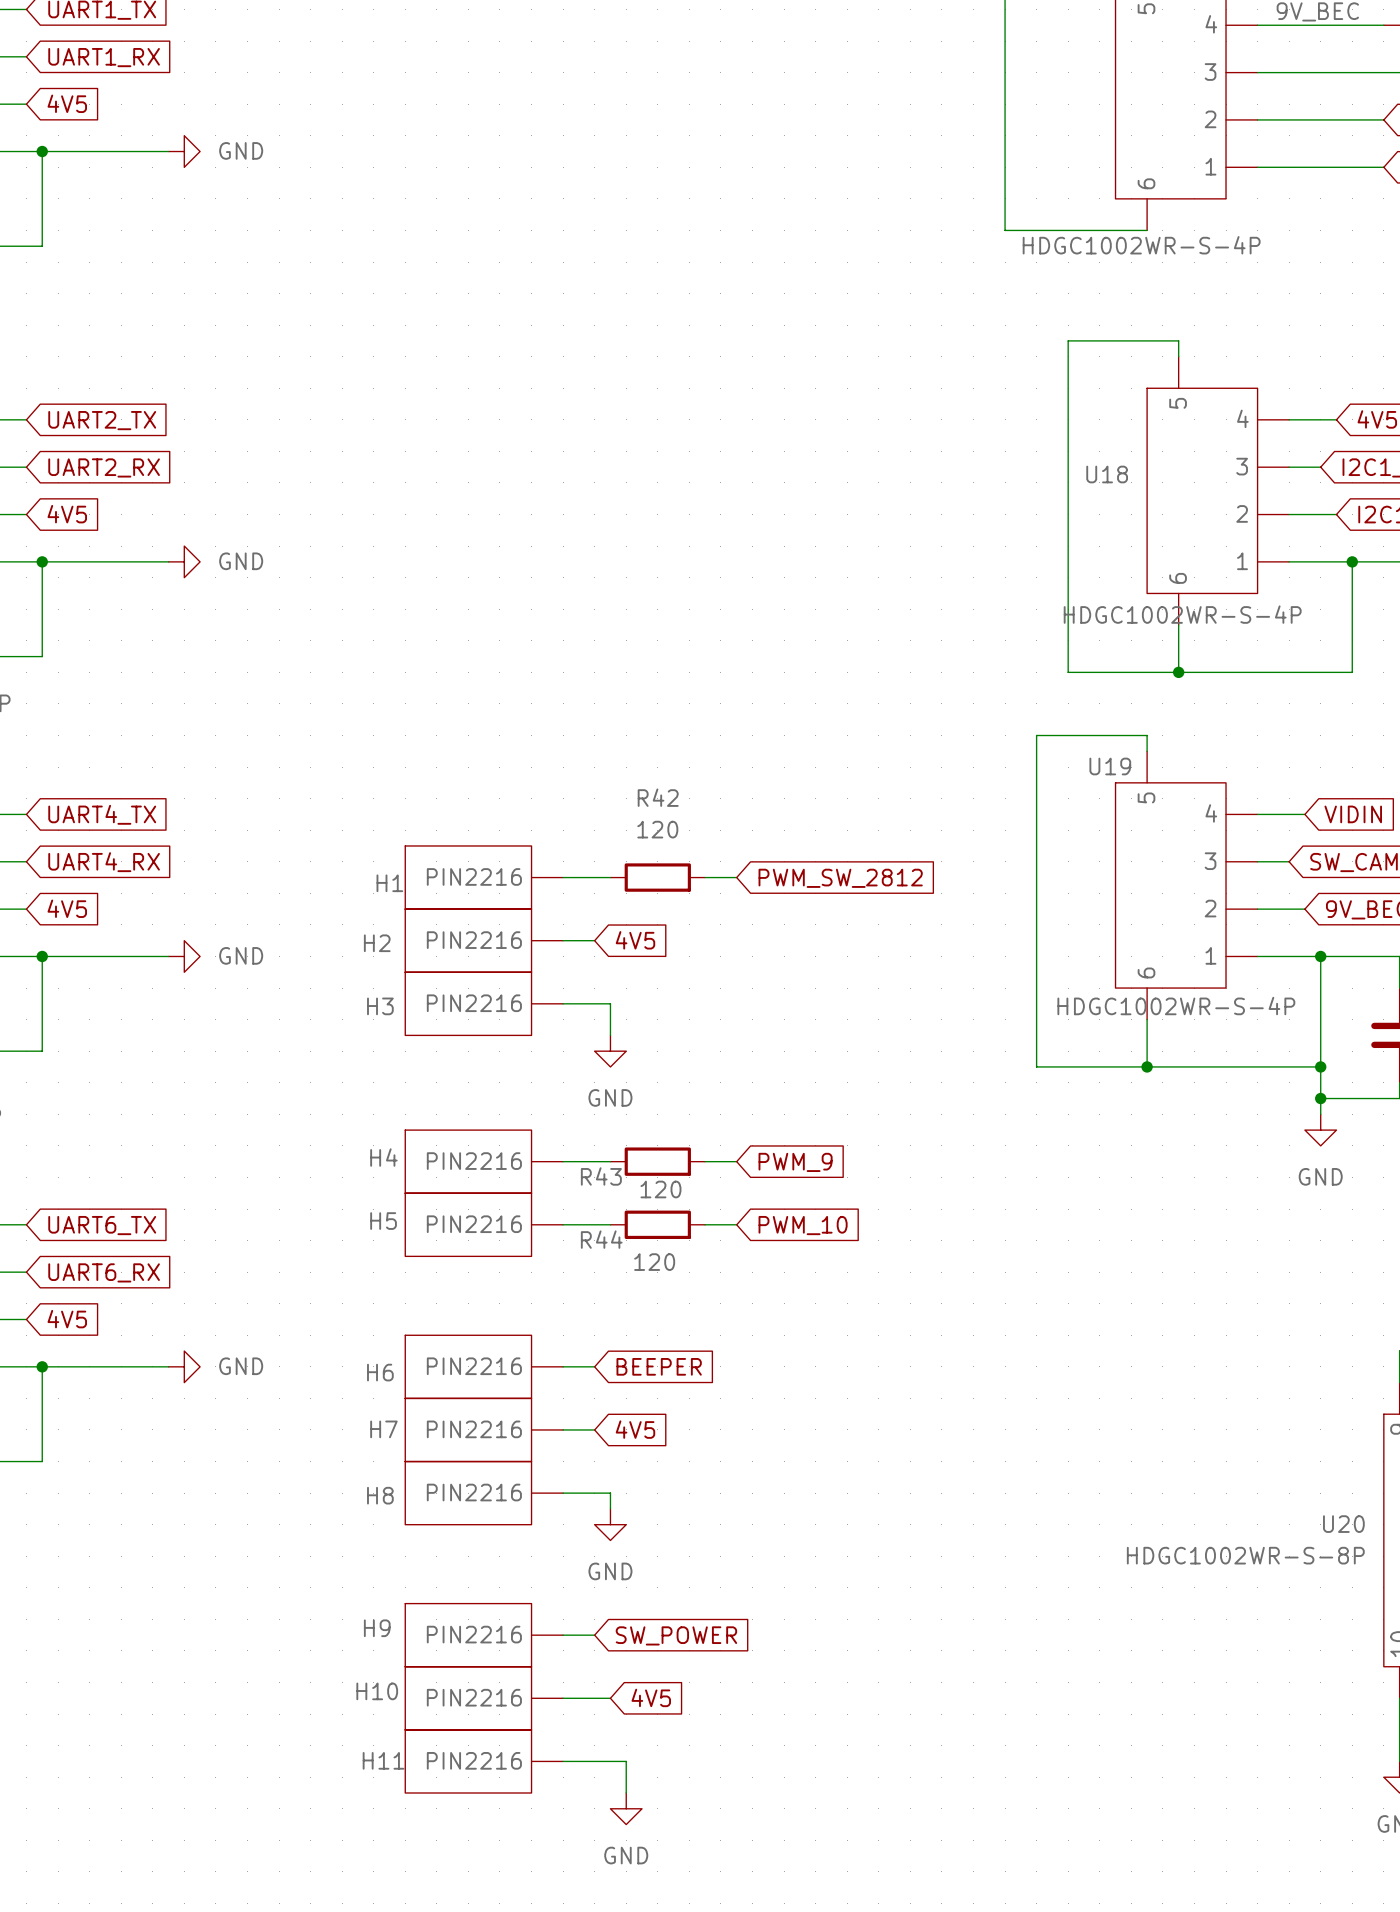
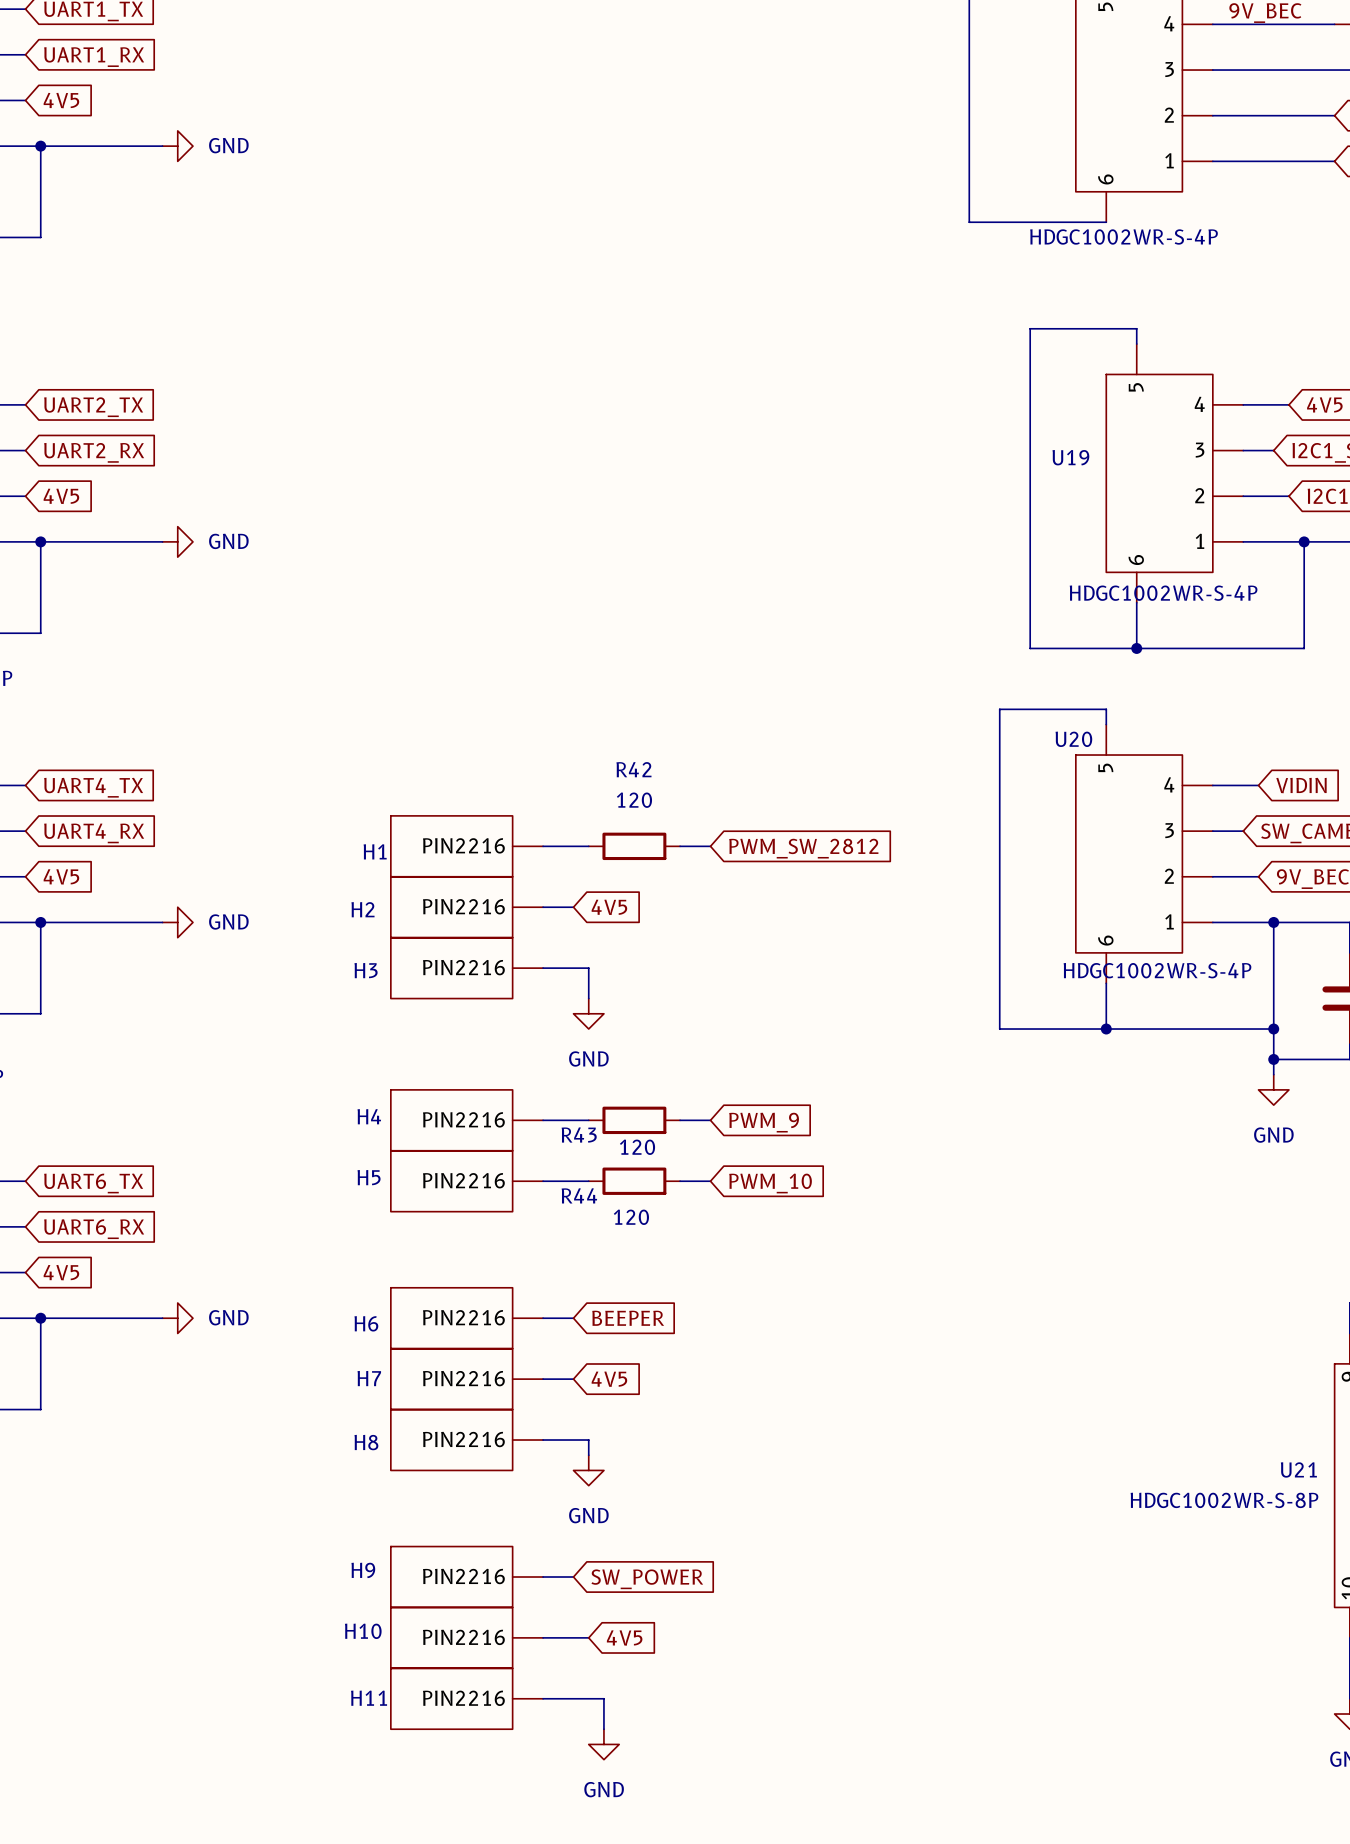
U18 name: U18 (1107, 474) -> U19 (1070, 457)
U19 name: U19 (1110, 766) -> U20 (1073, 739)
U20 name: U20 (1343, 1524) -> U21 (1298, 1469)

